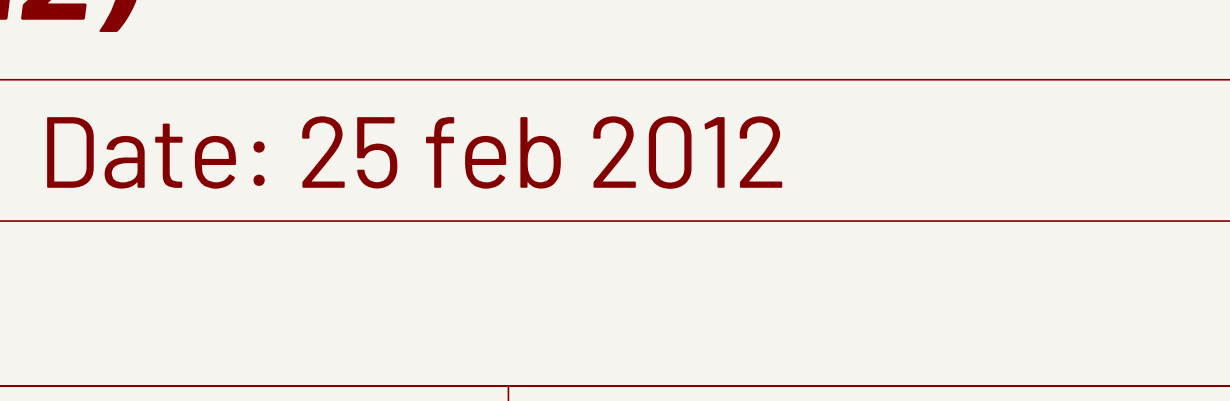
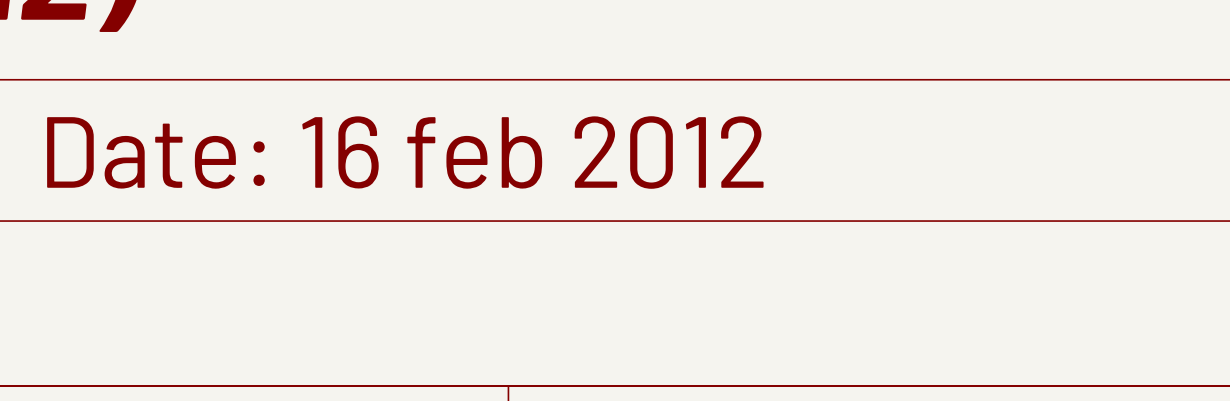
title block: Date: 25 feb 2012 (414, 152) -> Date: 16 feb 2012 (405, 152)

